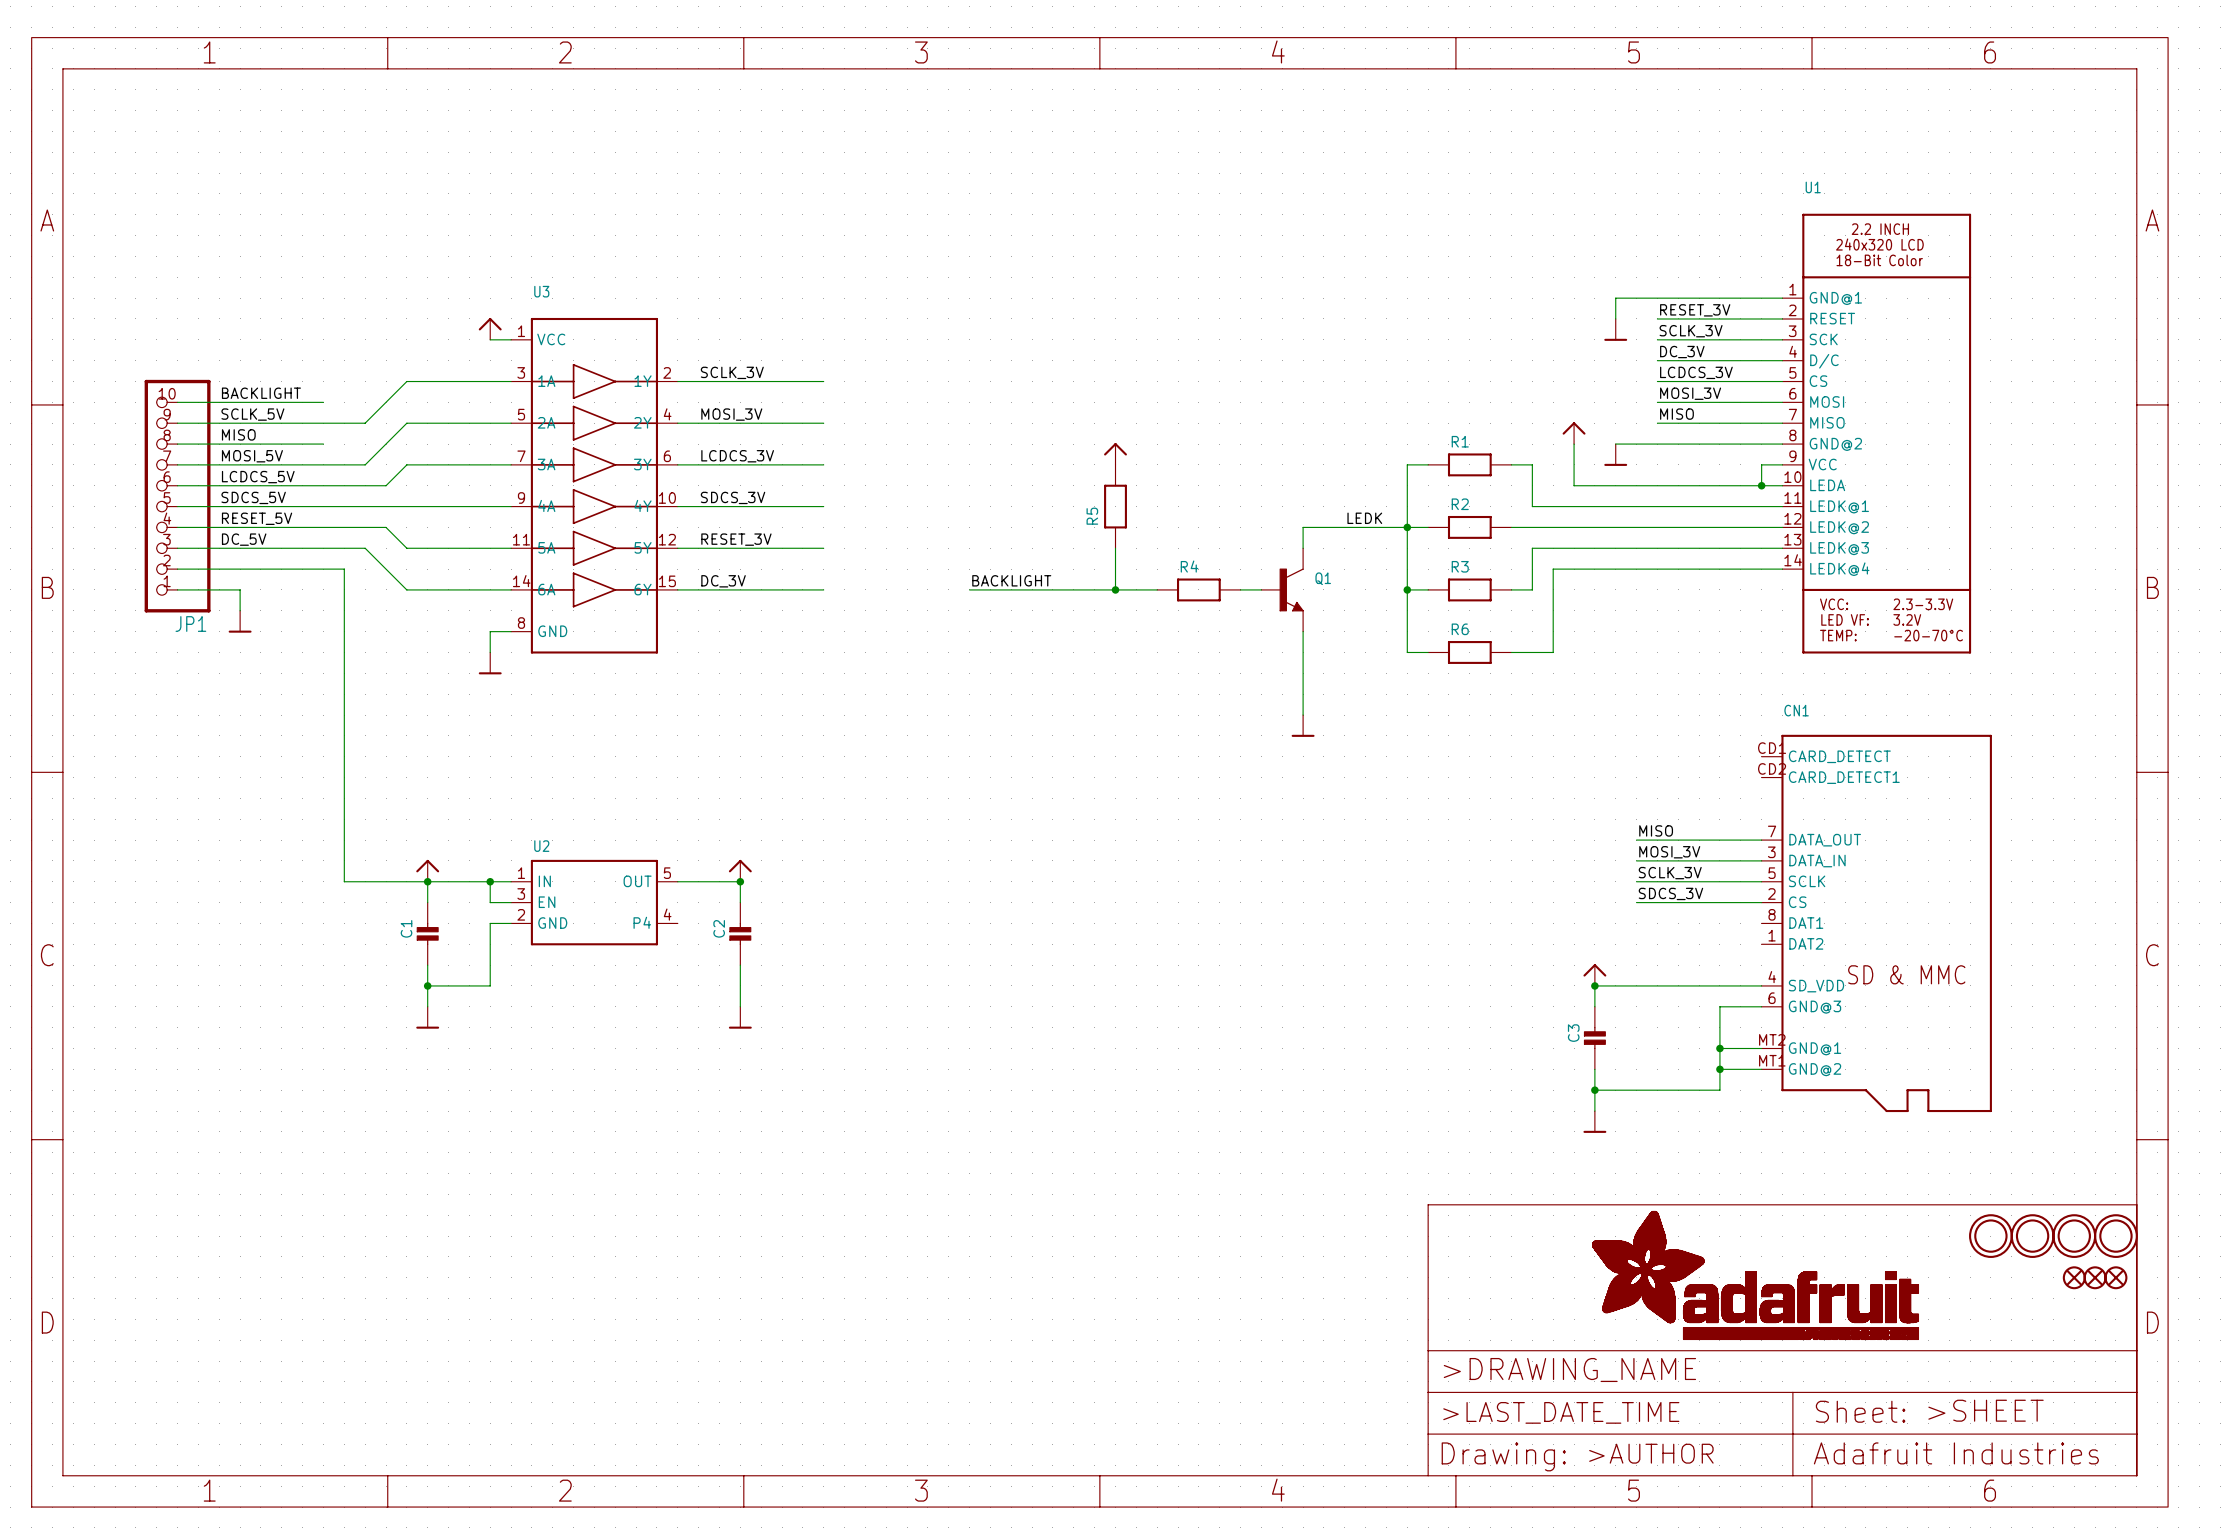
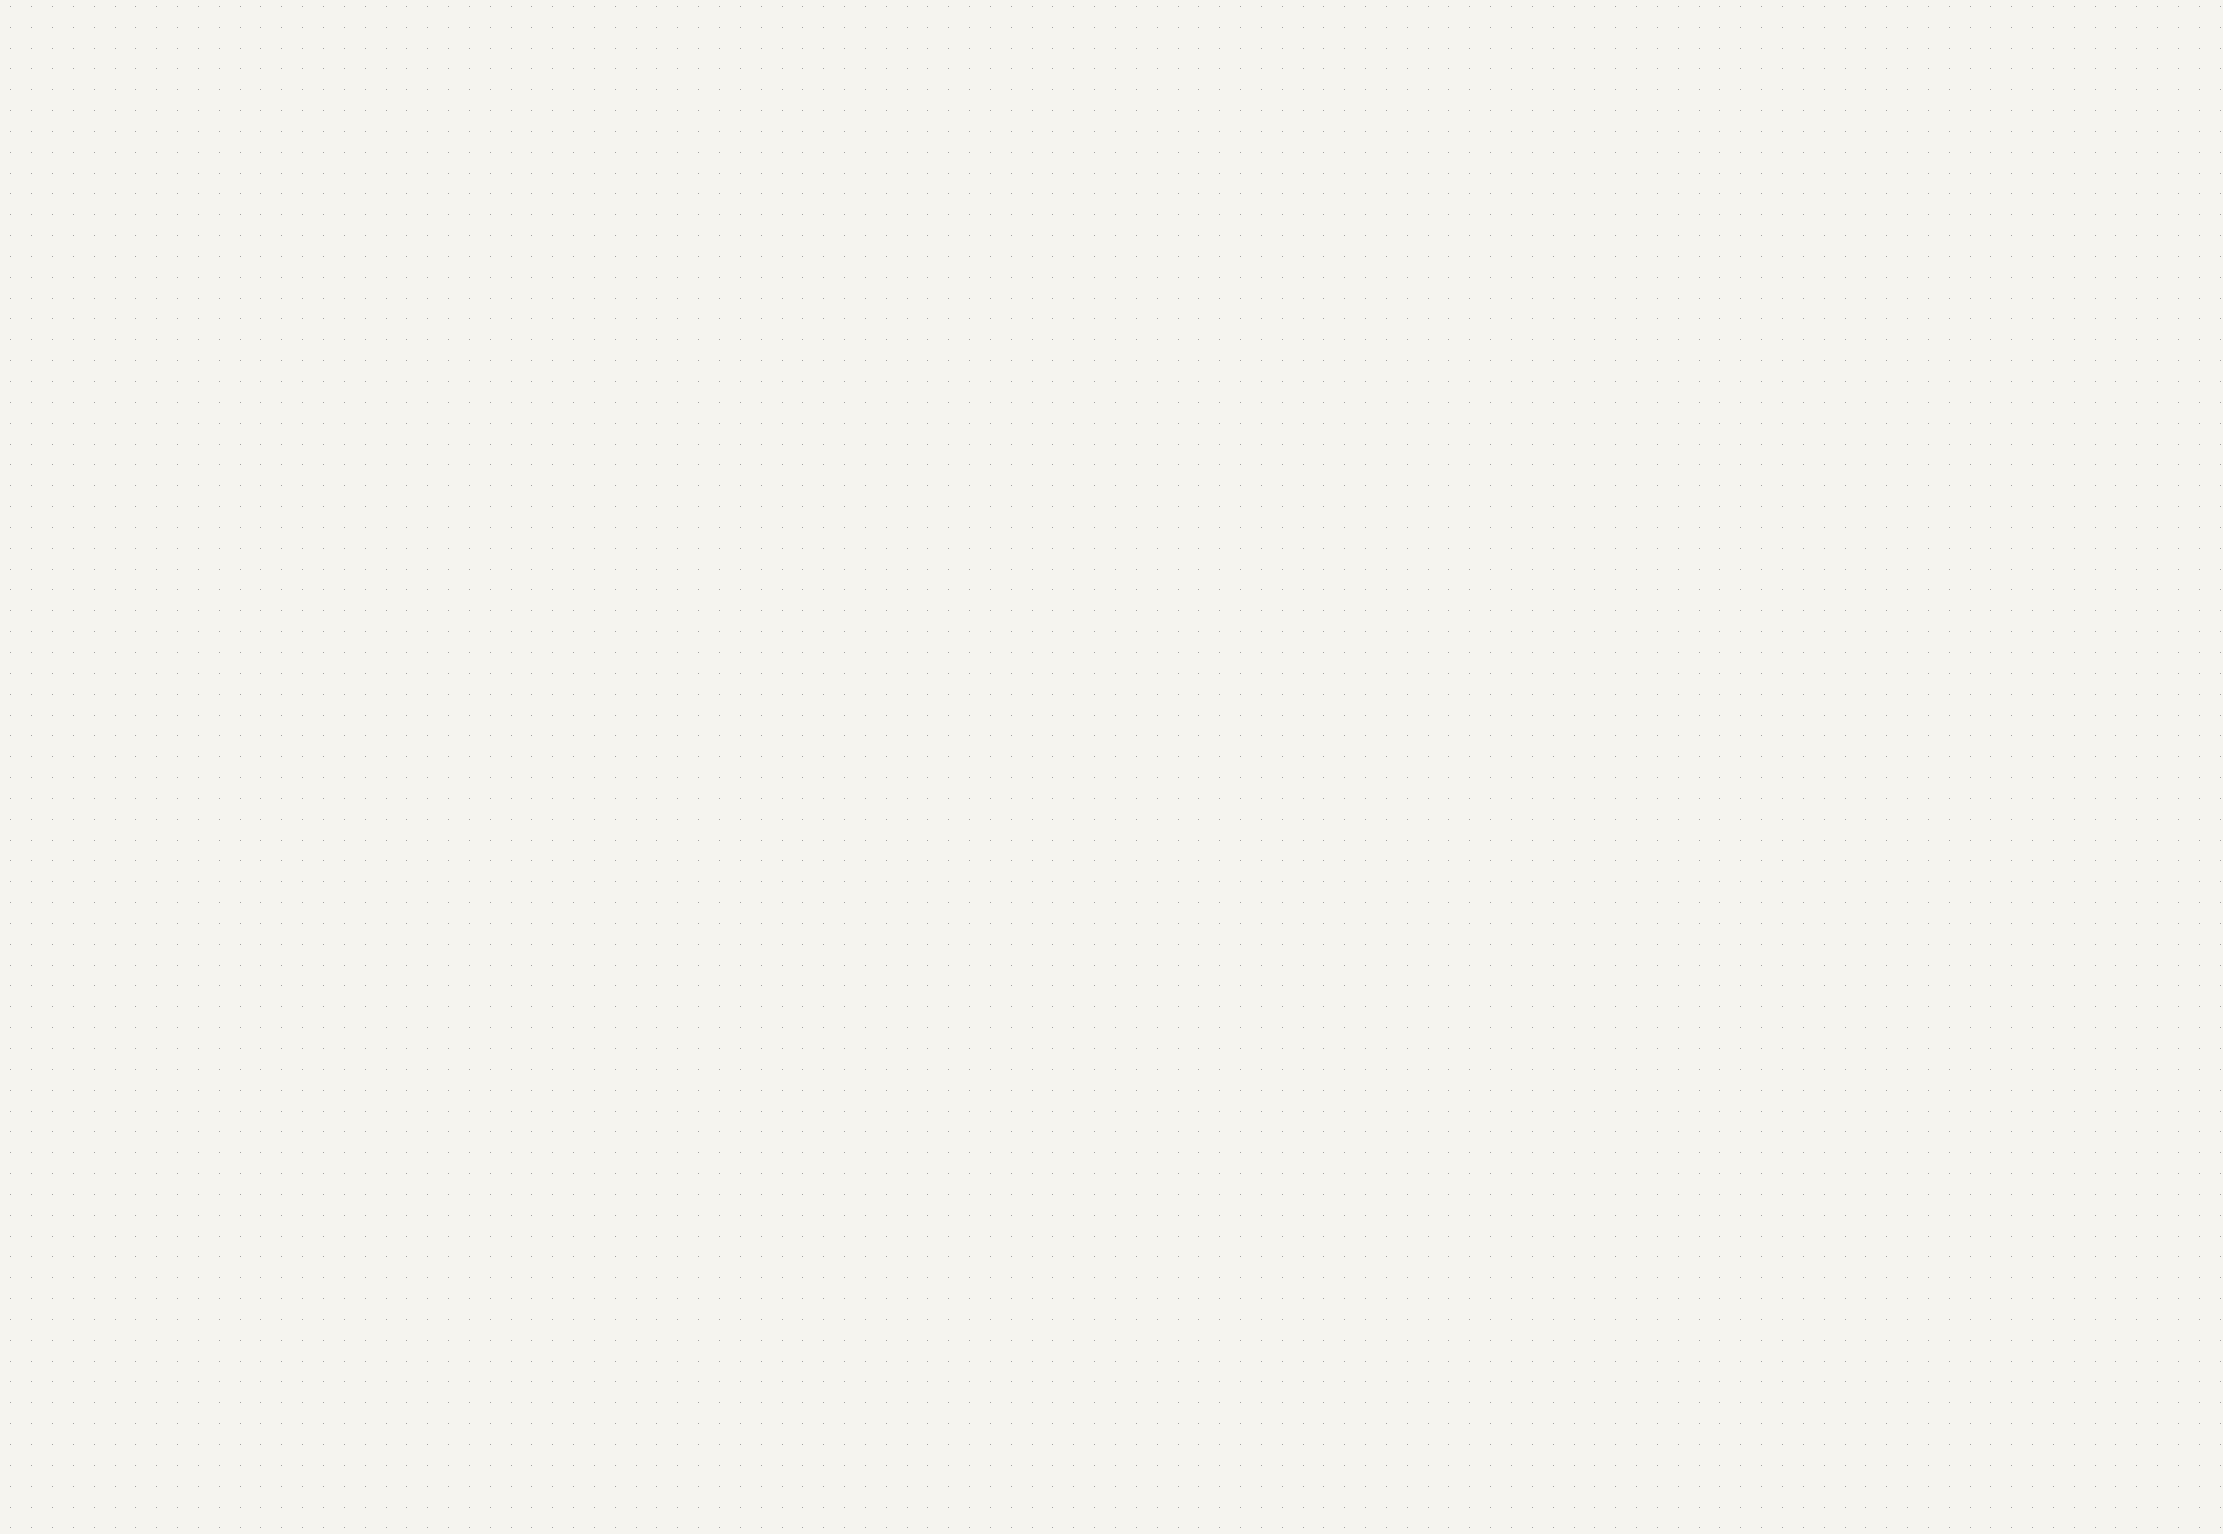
drawing: [31, 37, 2169, 1508] -> none
wire: (1782, 298) (1615, 298) (1615, 318) -> none
label: RESET_3V (1695, 310) -> none
wire: (1657, 318) (1782, 318) -> none
power symbol: (490, 328) -> none
power symbol: (1615, 329) -> none
label: SCLK_3V (1691, 331) -> none
wire: (490, 339) (511, 339) -> none
wire: (1657, 339) (1782, 339) -> none
label: DC_3V (1682, 352) -> none
wire: (1657, 360) (1782, 360) -> none
label: SCLK_3V (732, 372) -> none
label: LCDCS_3V (1696, 372) -> none
wire: (511, 381) (406, 381) (365, 423) (177, 423) -> none
wire: (677, 381) (823, 381) -> none
wire: (1657, 381) (1782, 381) -> none
label: BACKLIGHT (261, 393) -> none
label: MOSI_3V (1690, 393) -> none
wire: (177, 402) (323, 402) -> none
wire: (1657, 402) (1782, 402) -> none
label: SCLK_5V (252, 414) -> none
label: MOSI_3V (731, 414) -> none
label: MISO (1676, 414) -> none
wire: (511, 423) (406, 423) (365, 464) (177, 464) -> none
wire: (677, 423) (823, 423) -> none
wire: (1657, 423) (1782, 423) -> none
power symbol: (1574, 433) -> none
U1: (1876, 433) -> none
label: MISO (238, 434) -> none
wire: (177, 444) (323, 444) -> none
wire: (1574, 444) (1574, 485) (1782, 485) -> none
wire: (1615, 444) (1782, 444) -> none
power symbol: (1115, 453) -> none
power symbol: (1615, 454) -> none
label: MOSI_5V (252, 456) -> none
label: LCDCS_3V (737, 456) -> none
wire: (511, 464) (406, 464) (386, 485) (177, 485) -> none
wire: (677, 464) (823, 464) -> none
wire: (1428, 464) (1407, 464) (1407, 652) (1428, 652) -> none
R1: (1469, 464) -> none
wire: (1511, 464) (1532, 464) (1532, 506) (1782, 506) -> none
wire: (1782, 464) (1761, 464) (1761, 485) -> none
label: LCDCS_5V (258, 477) -> none
U3: (594, 485) -> none
junction: (1761, 485) -> none
JP1: (177, 496) -> none
label: SDCS_5V (253, 497) -> none
label: SDCS_3V (733, 497) -> none
wire: (177, 506) (511, 506) -> none
wire: (677, 506) (823, 506) -> none
R5: (1115, 506) -> none
label: RESET_5V (257, 518) -> none
label: LEDK (1364, 518) -> none
wire: (177, 527) (386, 527) (406, 548) (511, 548) -> none
junction: (1407, 527) -> none
wire: (1428, 527) (1303, 527) (1303, 548) -> none
R2: (1469, 527) -> none
wire: (1511, 527) (1782, 527) -> none
label: DC_5V (244, 539) -> none
label: RESET_3V (736, 539) -> none
wire: (177, 548) (365, 548) (406, 589) (511, 589) -> none
wire: (677, 548) (823, 548) -> none
wire: (1115, 548) (1115, 589) -> none
wire: (1782, 548) (1532, 548) (1532, 589) (1511, 589) -> none
wire: (177, 569) (344, 569) (344, 881) (511, 881) -> none
wire: (1782, 569) (1553, 569) (1553, 652) (1511, 652) -> none
label: BACKLIGHT (1011, 580) -> none
label: DC_3V (723, 581) -> none
wire: (177, 589) (240, 589) (240, 610) -> none
wire: (677, 589) (823, 589) -> none
wire: (969, 589) (1157, 589) -> none
junction: (1115, 589) -> none
R4: (1198, 589) -> none
wire: (1240, 589) (1261, 589) -> none
Q1: (1282, 589) -> none
wire: (1407, 589) (1428, 589) -> none
junction: (1407, 589) -> none
R3: (1469, 589) -> none
power symbol: (240, 621) -> none
wire: (511, 631) (490, 631) (490, 652) -> none
wire: (1303, 631) (1303, 715) -> none
R6: (1469, 652) -> none
power symbol: (490, 663) -> none
power symbol: (1303, 725) -> none
label: MISO (1656, 830) -> none
wire: (1636, 840) (1761, 840) -> none
label: MOSI_3V (1669, 852) -> none
wire: (1636, 860) (1761, 860) -> none
power symbol: (427, 870) -> none
power symbol: (740, 870) -> none
label: SCLK_3V (1670, 873) -> none
wire: (427, 881) (427, 902) -> none
junction: (427, 881) -> none
wire: (490, 881) (490, 902) (511, 902) -> none
junction: (490, 881) -> none
wire: (677, 881) (740, 881) (740, 902) -> none
junction: (740, 881) -> none
wire: (1636, 881) (1761, 881) -> none
label: SDCS_3V (1670, 893) -> none
U2: (594, 902) -> none
wire: (1636, 902) (1761, 902) -> none
wire: (511, 923) (490, 923) (490, 985) (427, 985) -> none
CN1: (1876, 923) -> none
C1: (427, 933) -> none
C2: (740, 933) -> none
wire: (427, 965) (427, 1006) -> none
wire: (740, 965) (740, 1006) -> none
power symbol: (1594, 975) -> none
junction: (427, 985) -> none
junction: (1594, 985) -> none
wire: (1761, 985) (1594, 985) (1594, 1006) -> none
wire: (1761, 1006) (1719, 1006) (1719, 1090) (1594, 1090) -> none
power symbol: (427, 1017) -> none
power symbol: (740, 1017) -> none
C3: (1594, 1038) -> none
wire: (1719, 1048) (1761, 1048) -> none
junction: (1719, 1048) -> none
wire: (1594, 1069) (1594, 1111) -> none
wire: (1719, 1069) (1761, 1069) -> none
junction: (1719, 1069) -> none
junction: (1594, 1090) -> none
power symbol: (1594, 1121) -> none
part: (1990, 1236) -> none
part: (2032, 1236) -> none
part: (2074, 1236) -> none
part: (2115, 1236) -> none
part: (2074, 1277) -> none
part: (2095, 1277) -> none
part: (2115, 1277) -> none

